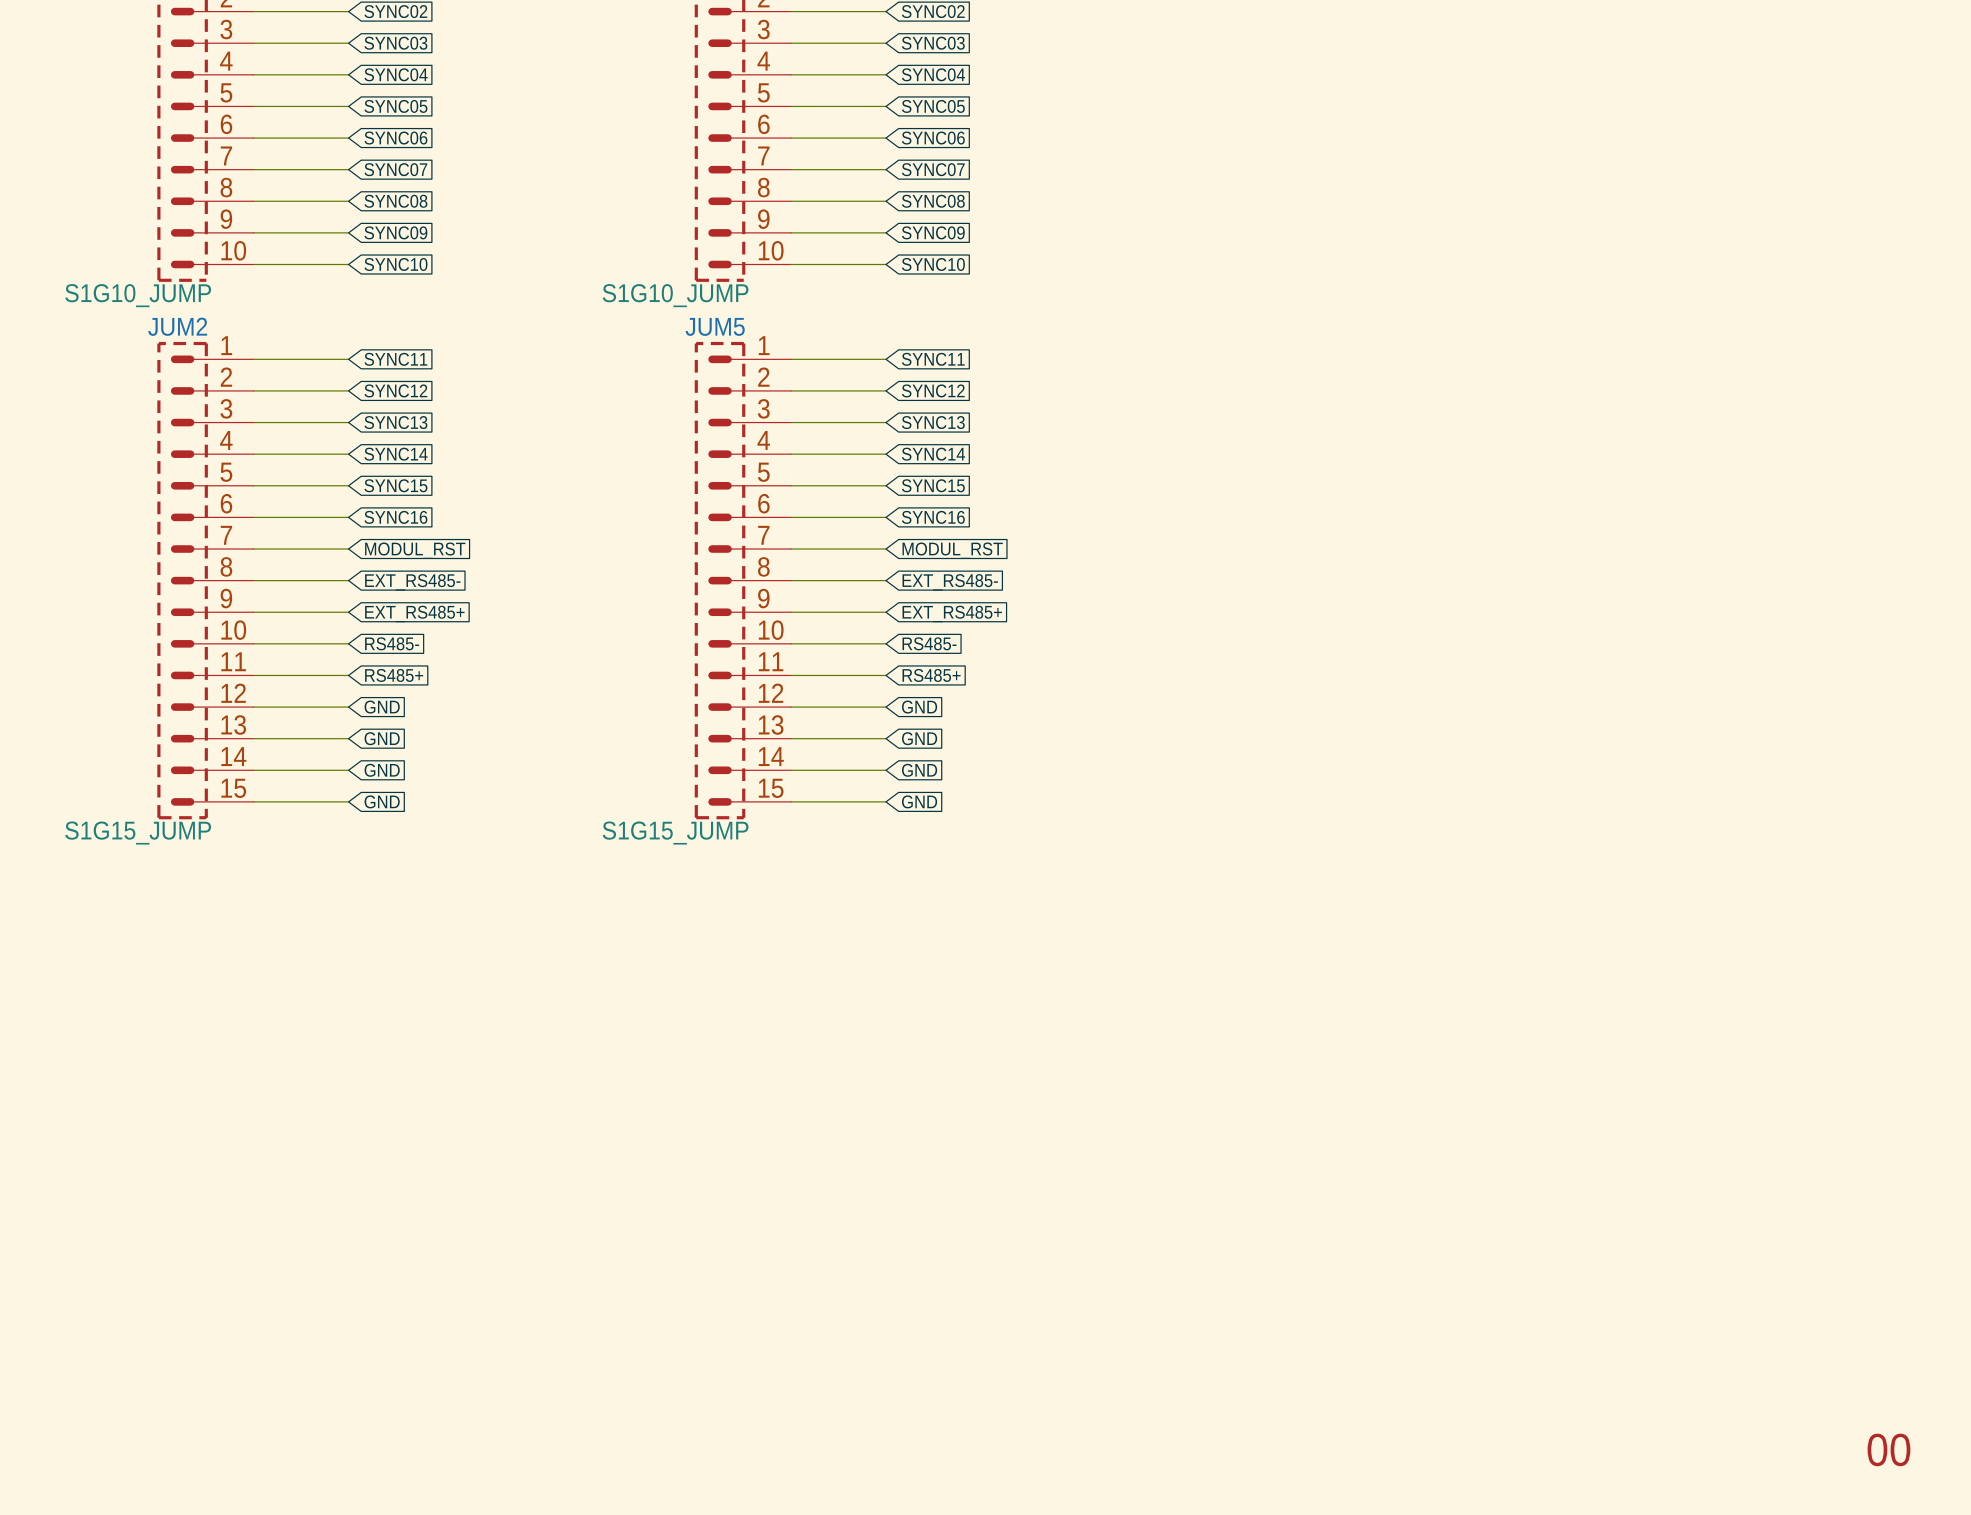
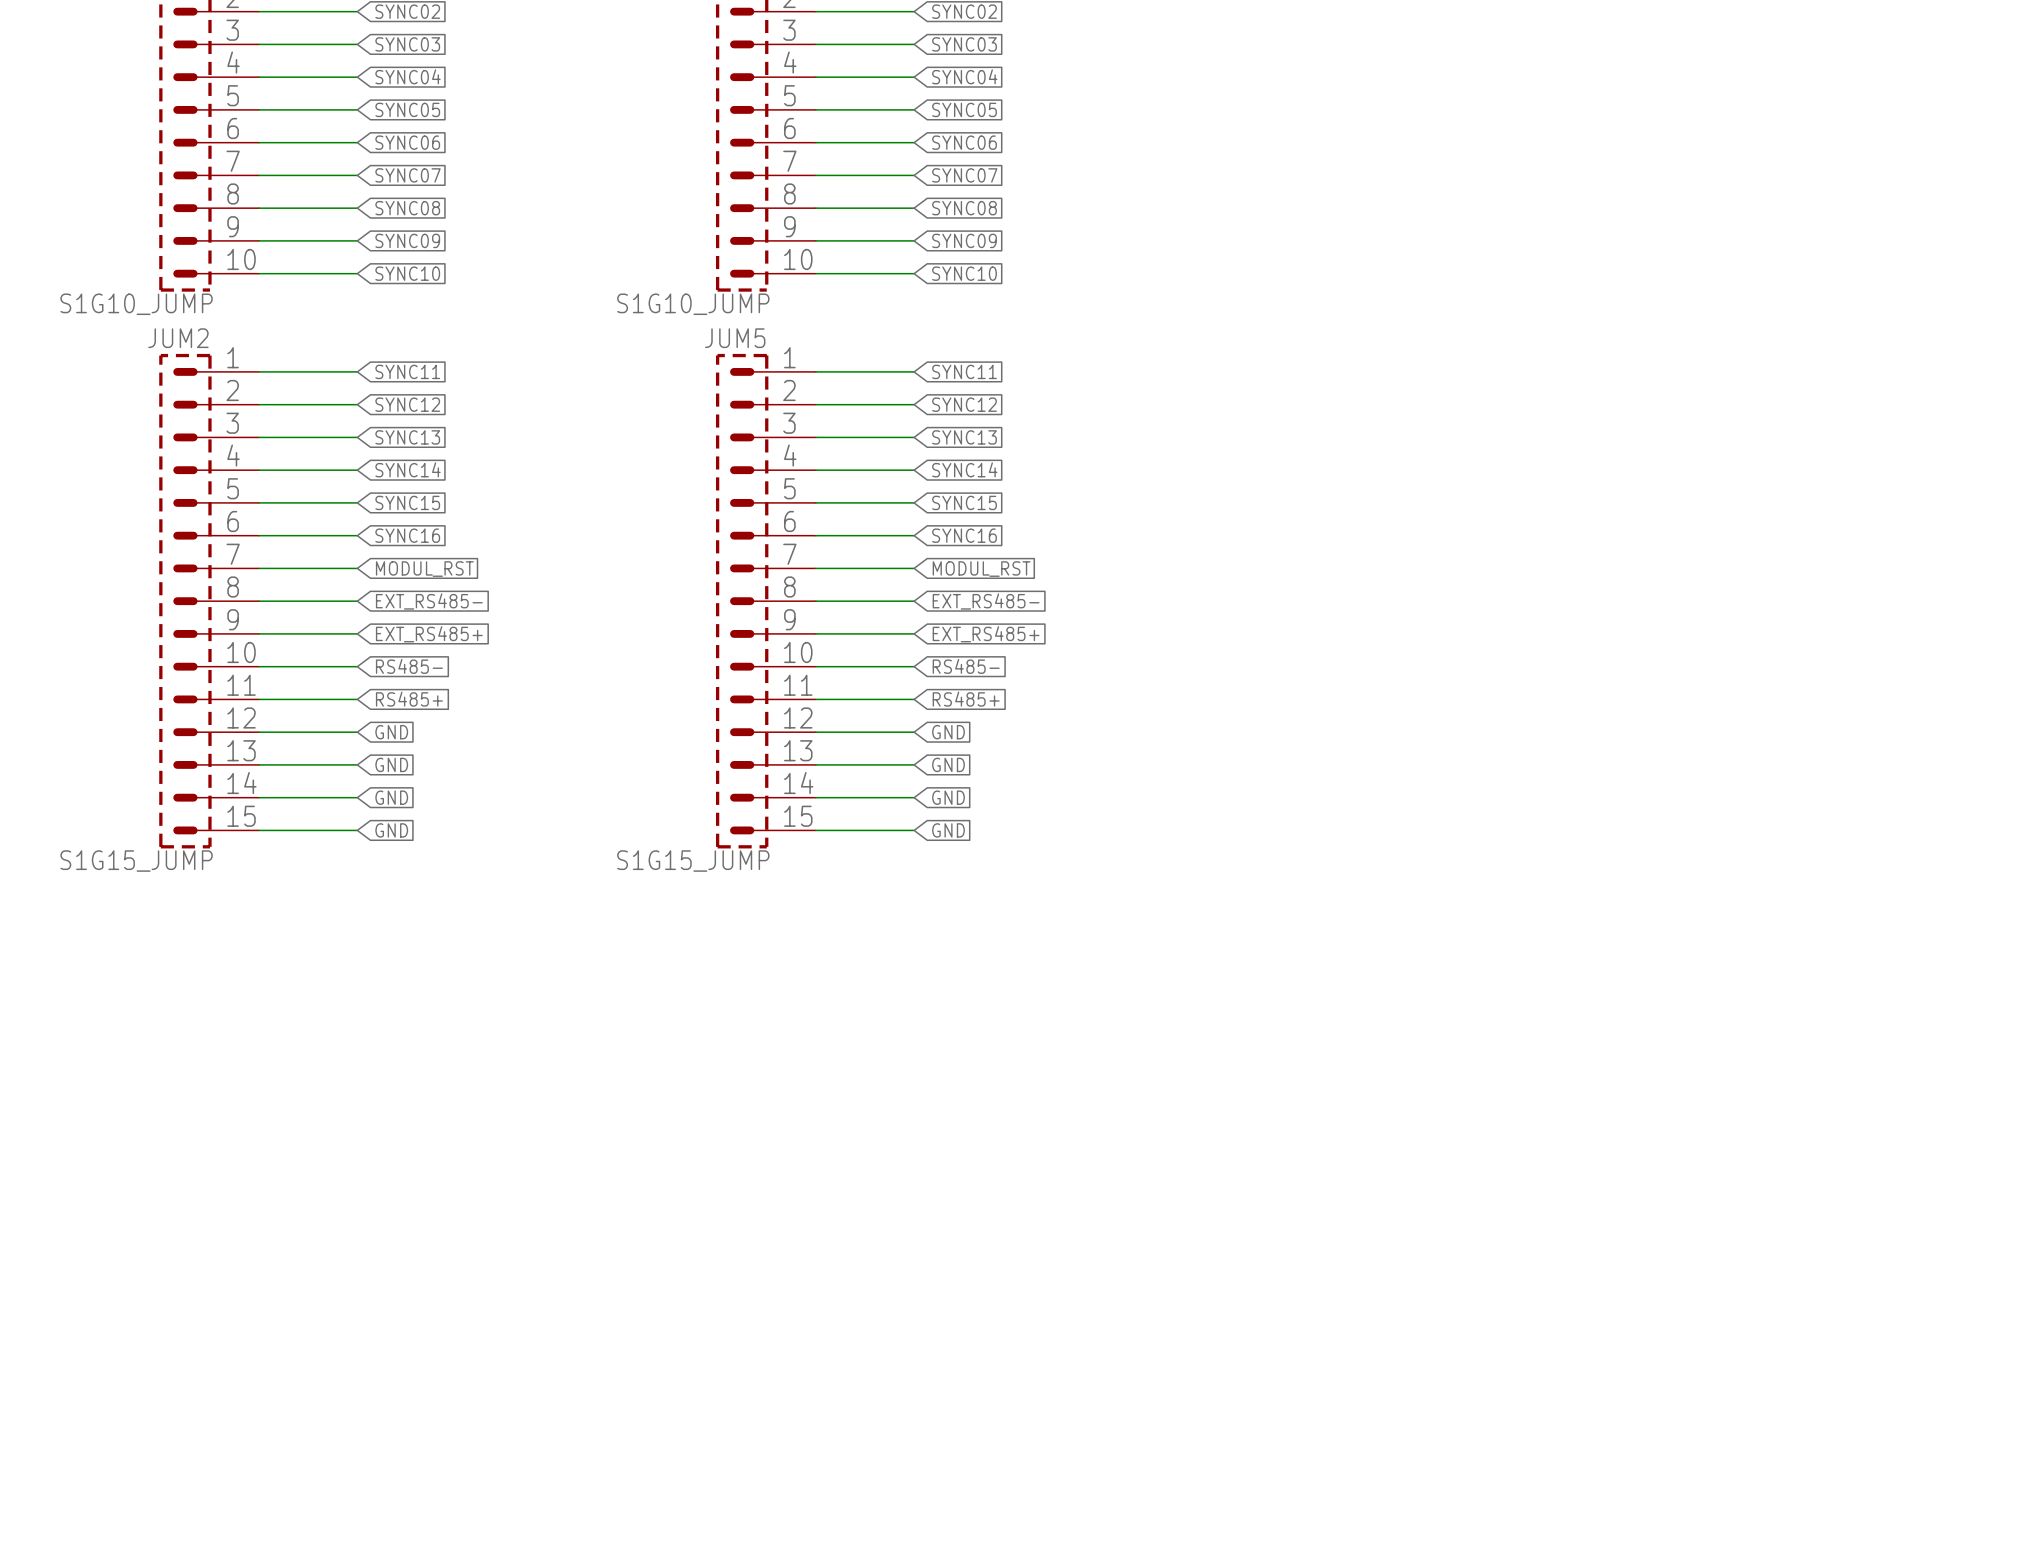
text: 00 (1888, 1449) -> none

